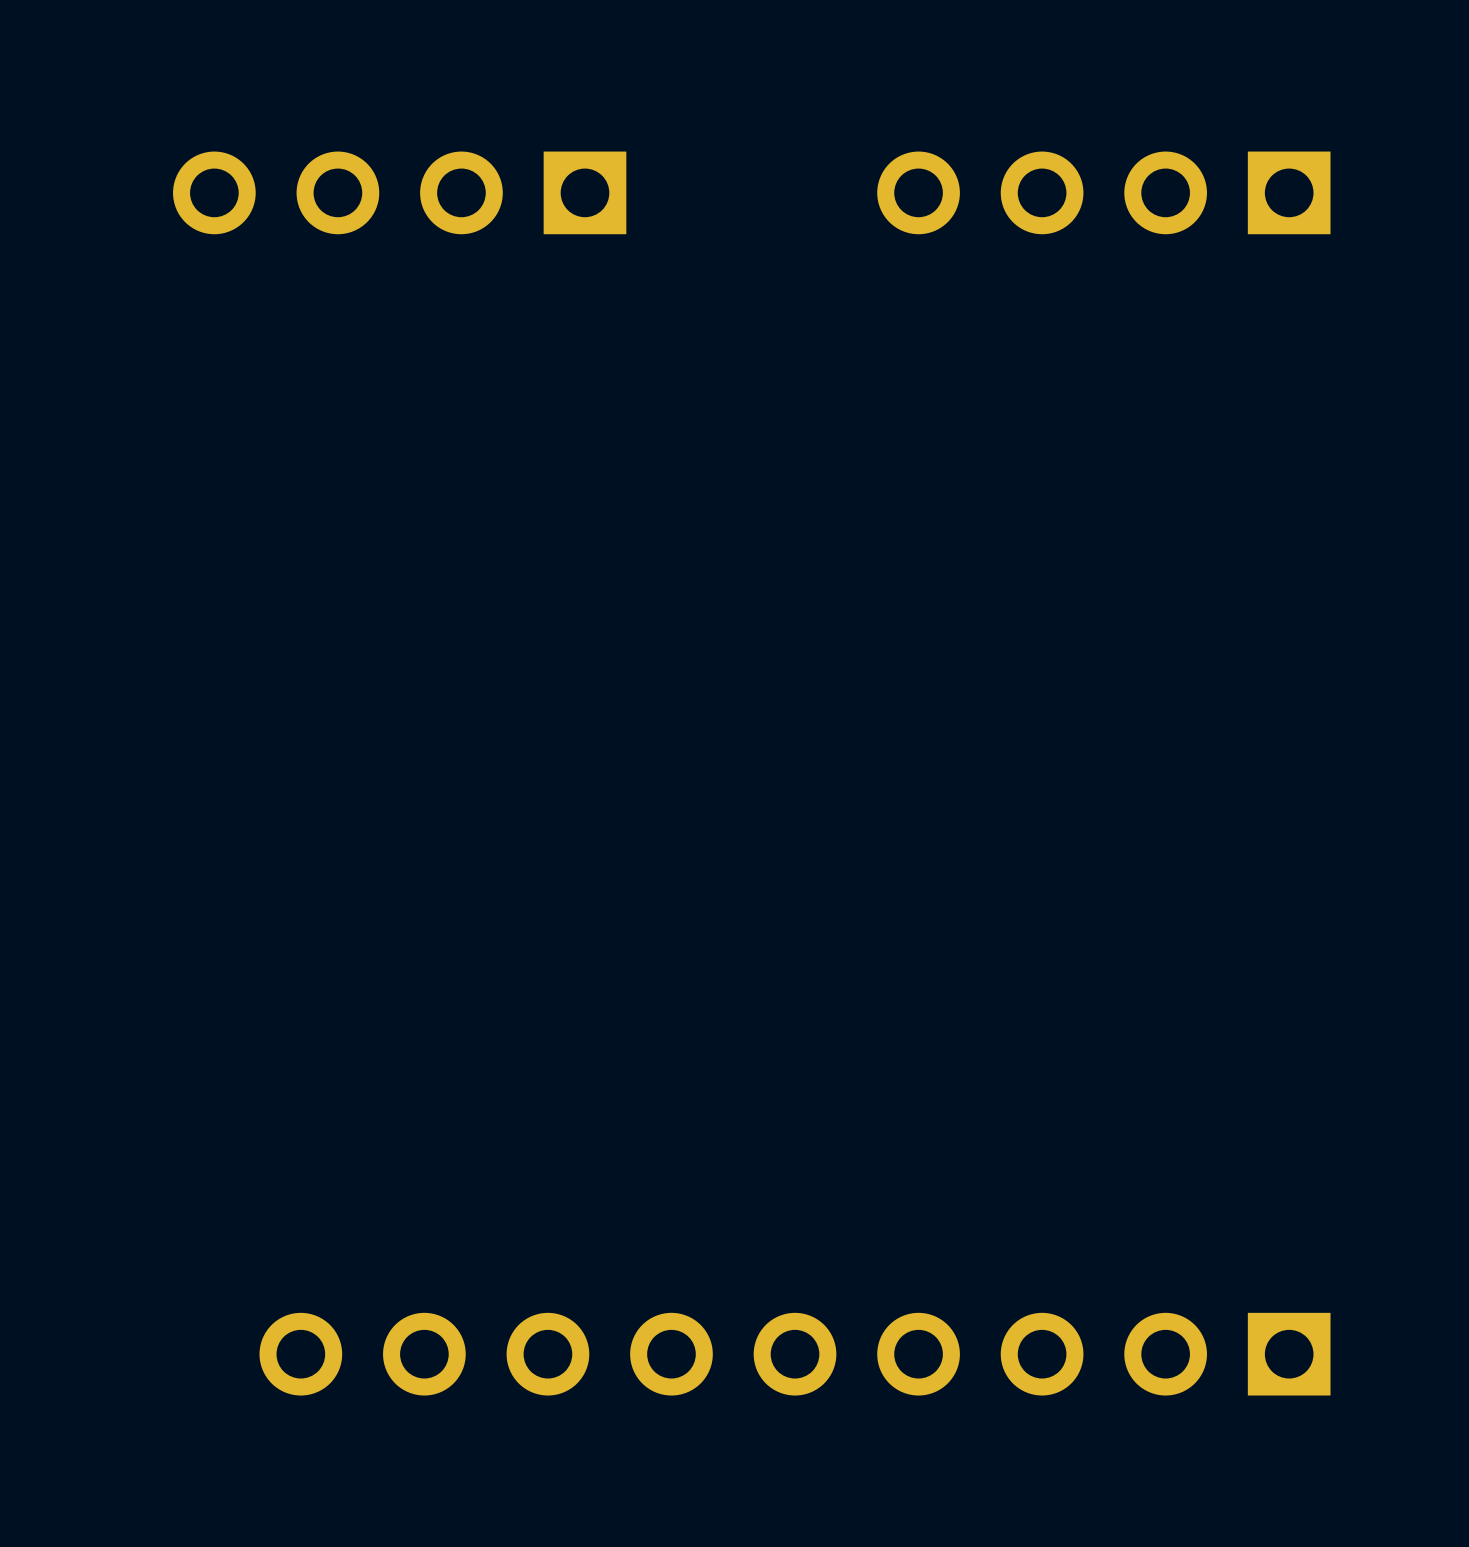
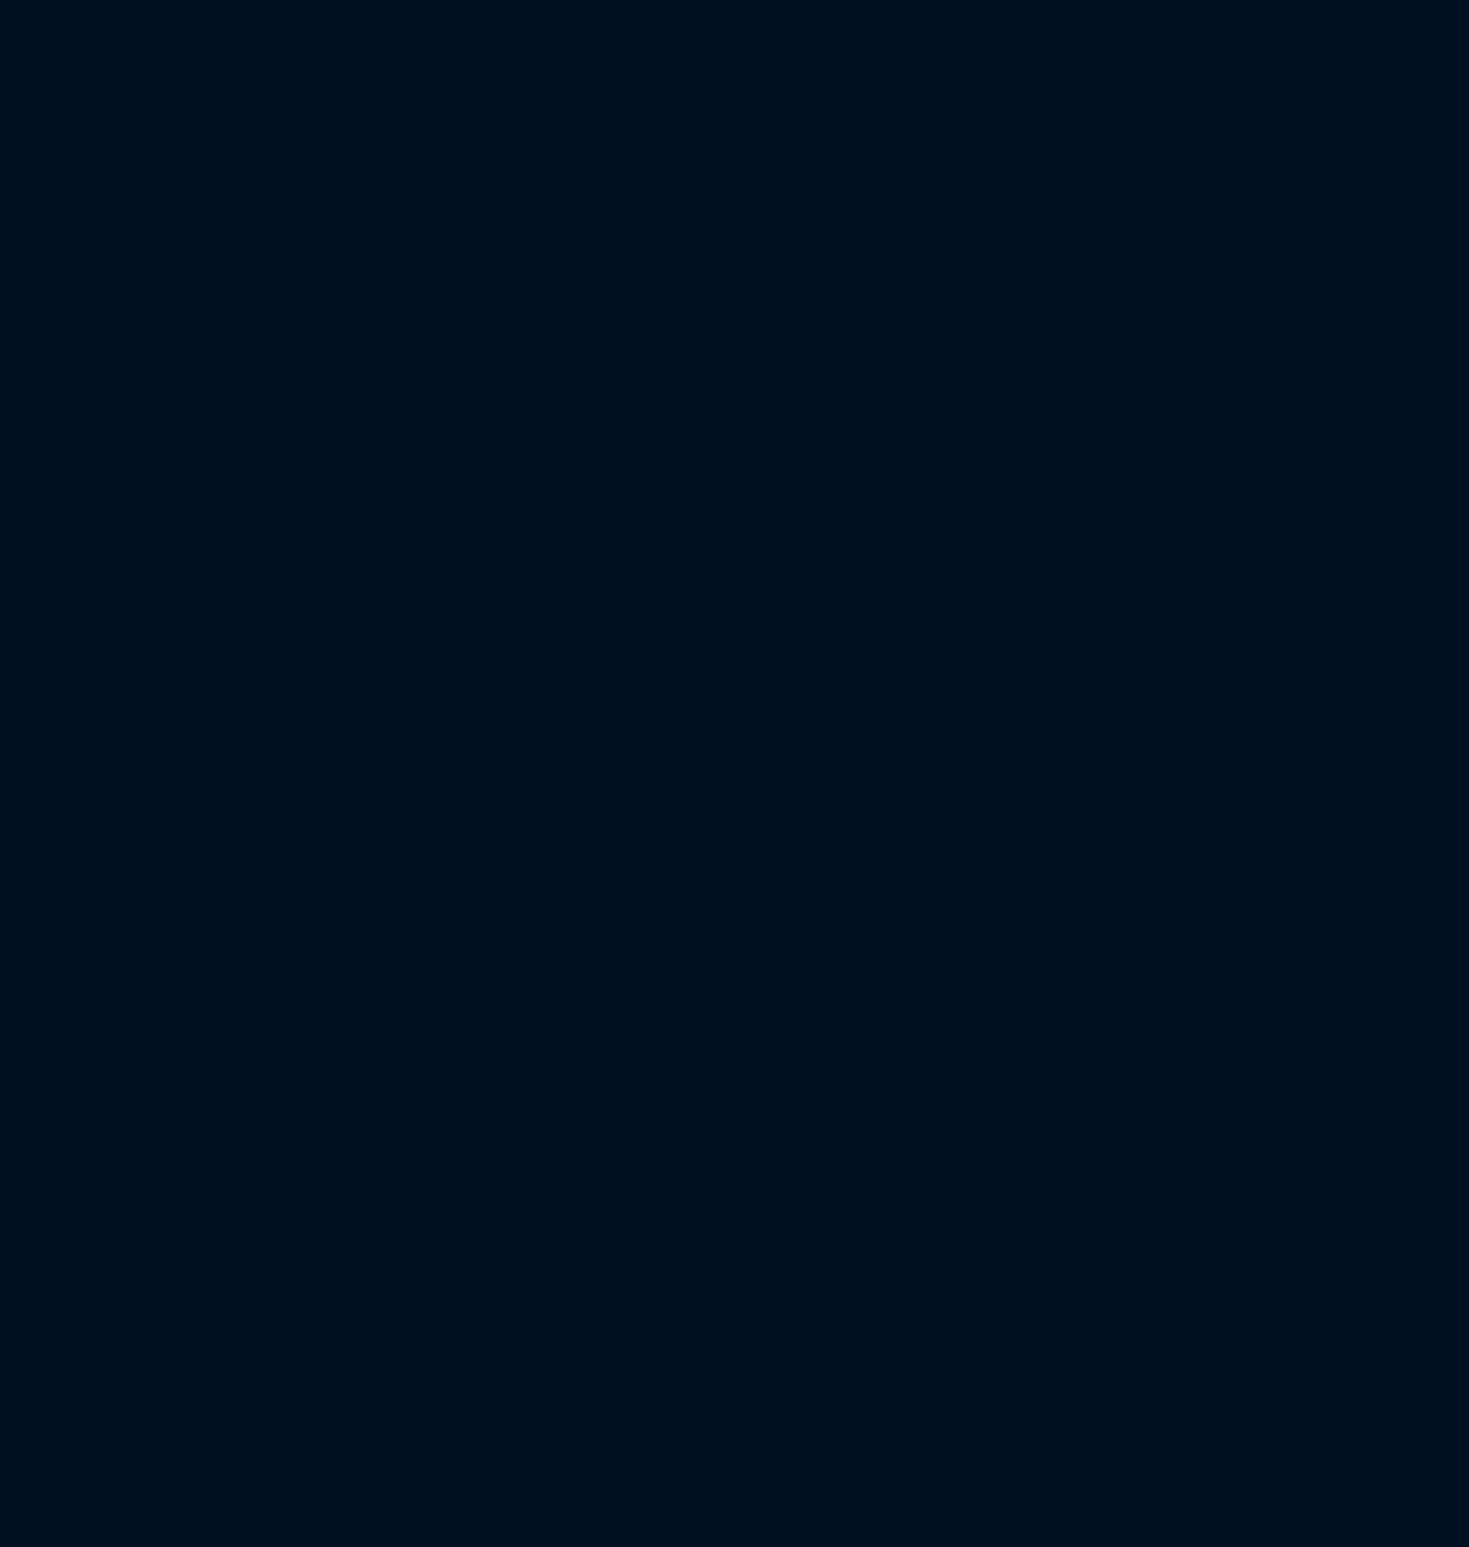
part: (399, 192) -> none
part: (1103, 192) -> none
part: (795, 1354) -> none

